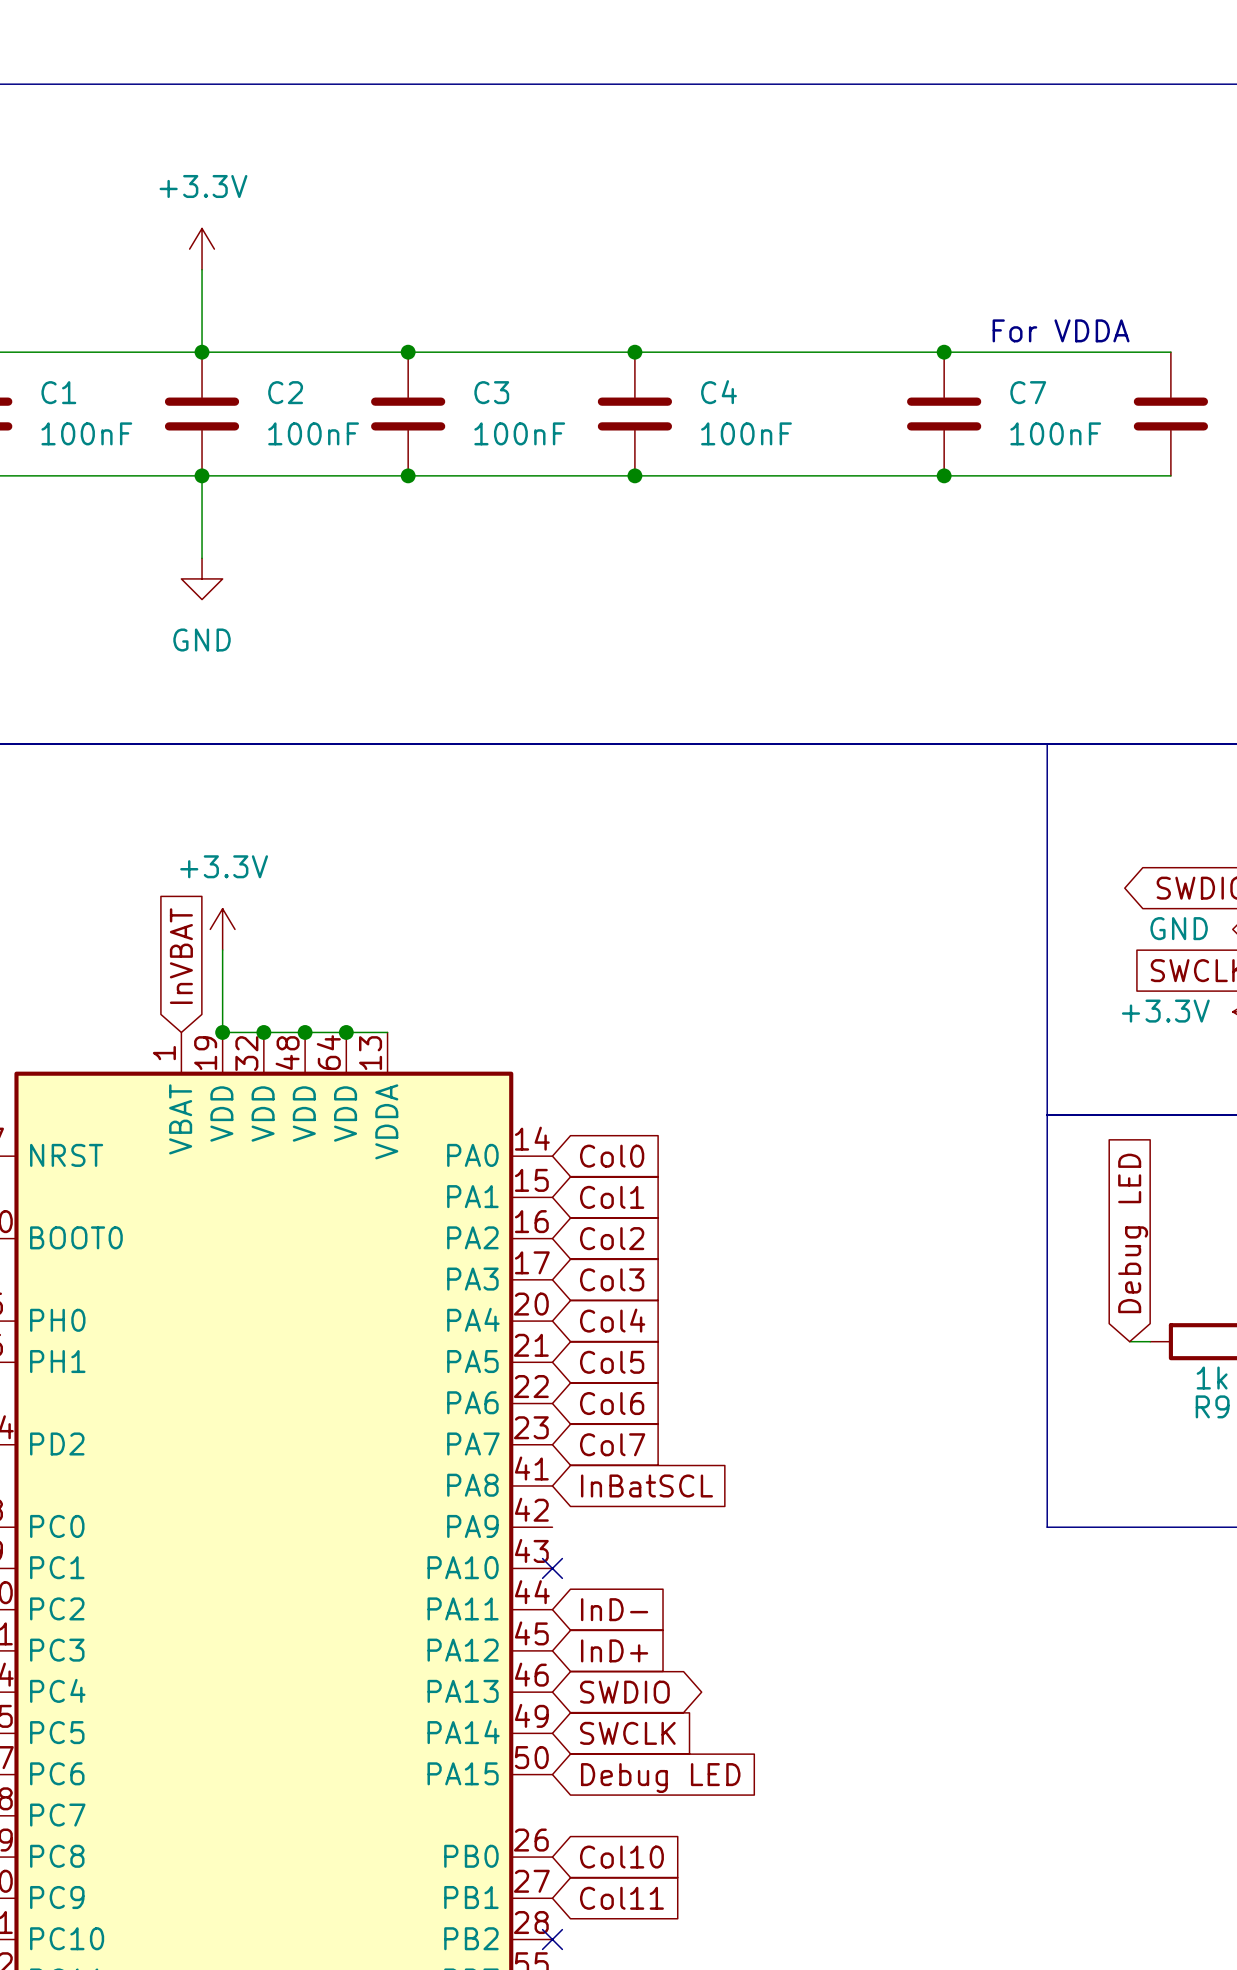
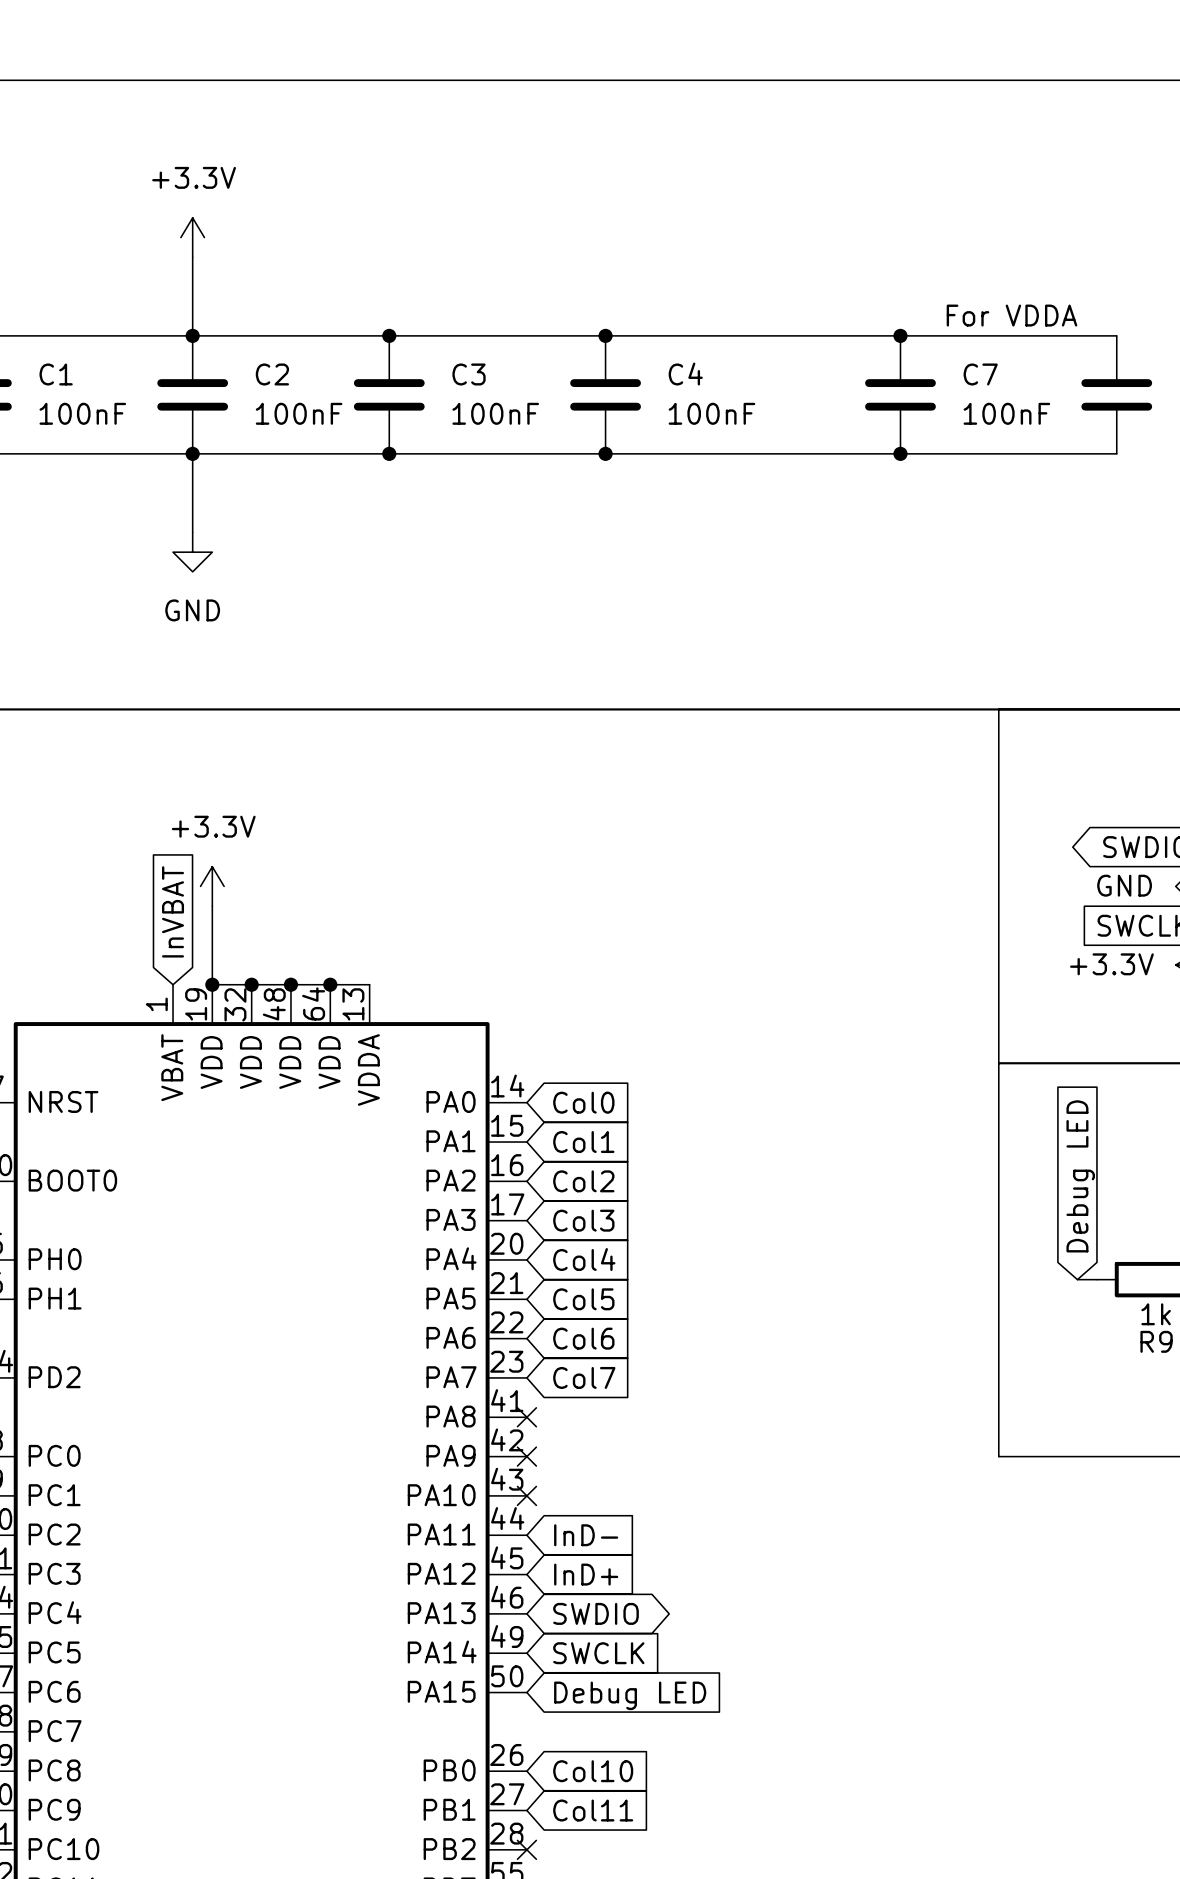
no-connect mark: none -> (526, 1417)
global label: InBatSCL (646, 1485) -> none
no-connect mark: none -> (526, 1456)

